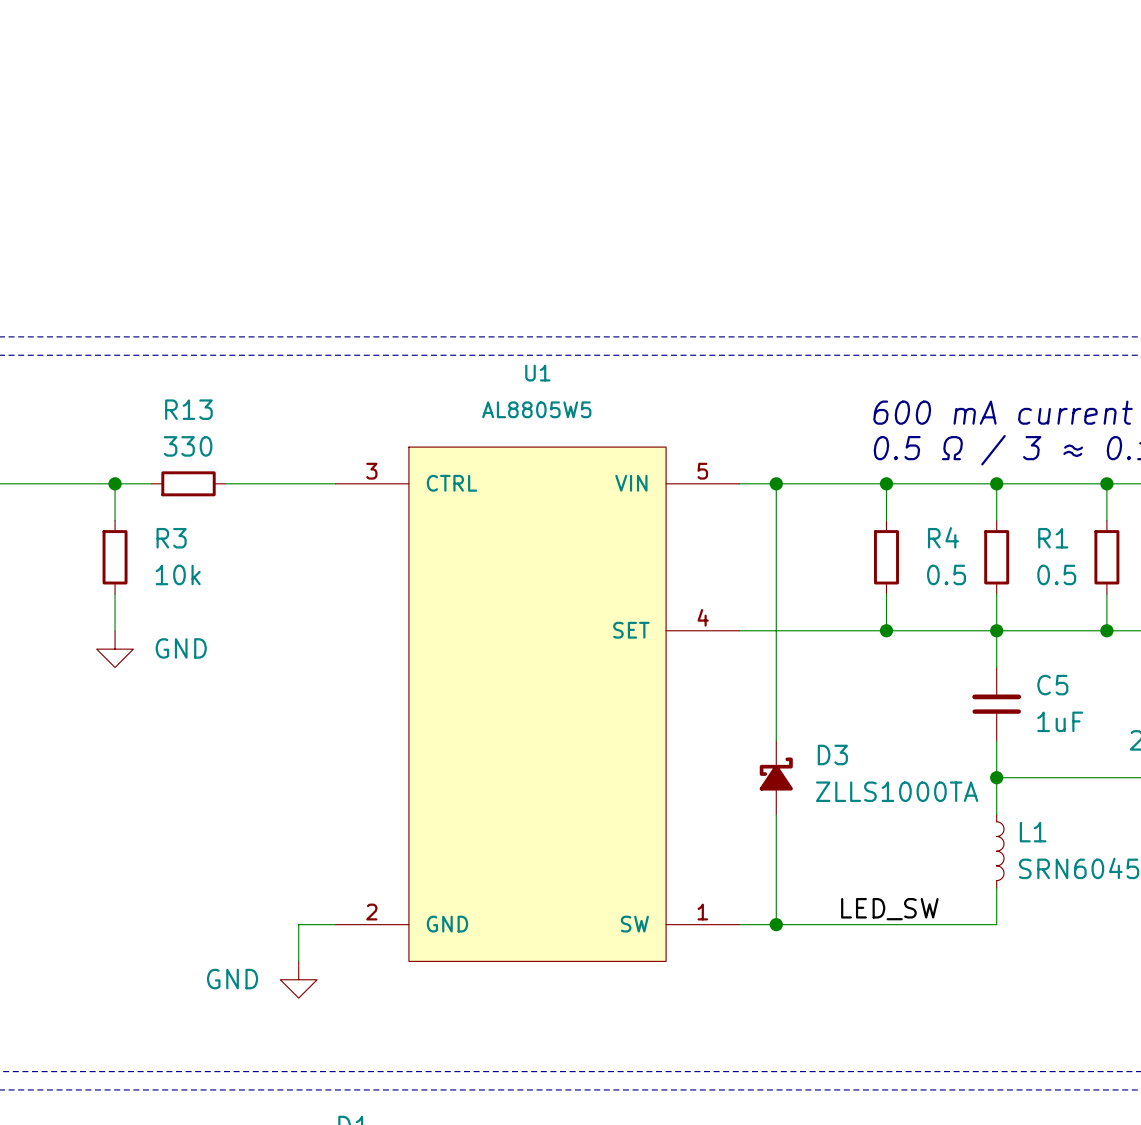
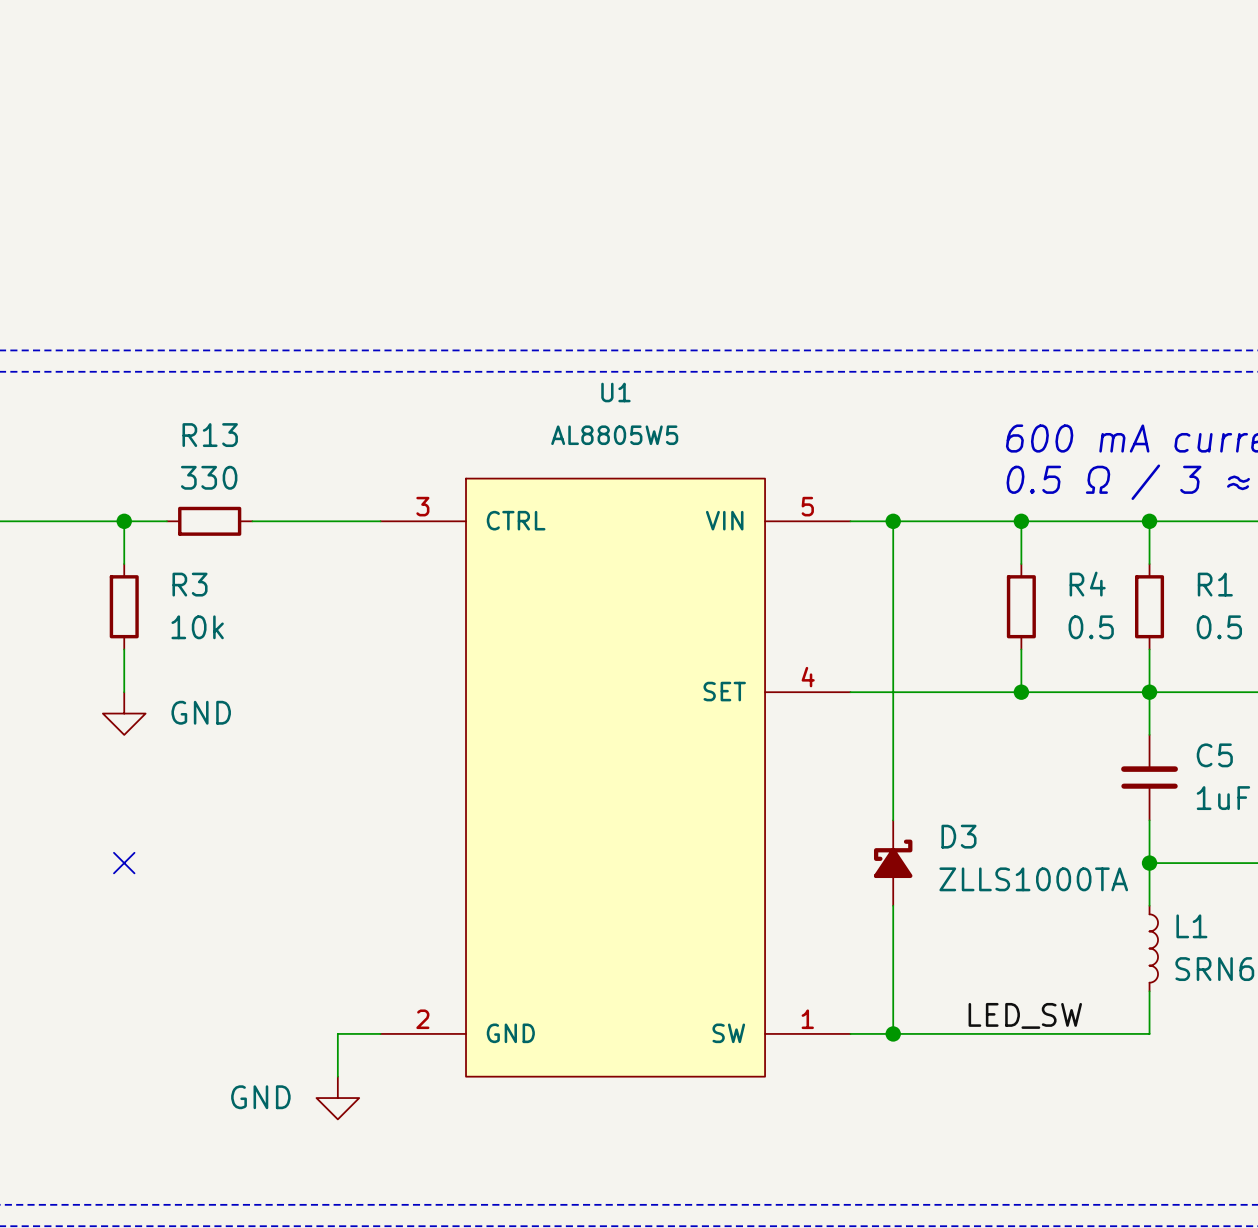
no-connect mark: none -> (124, 863)

